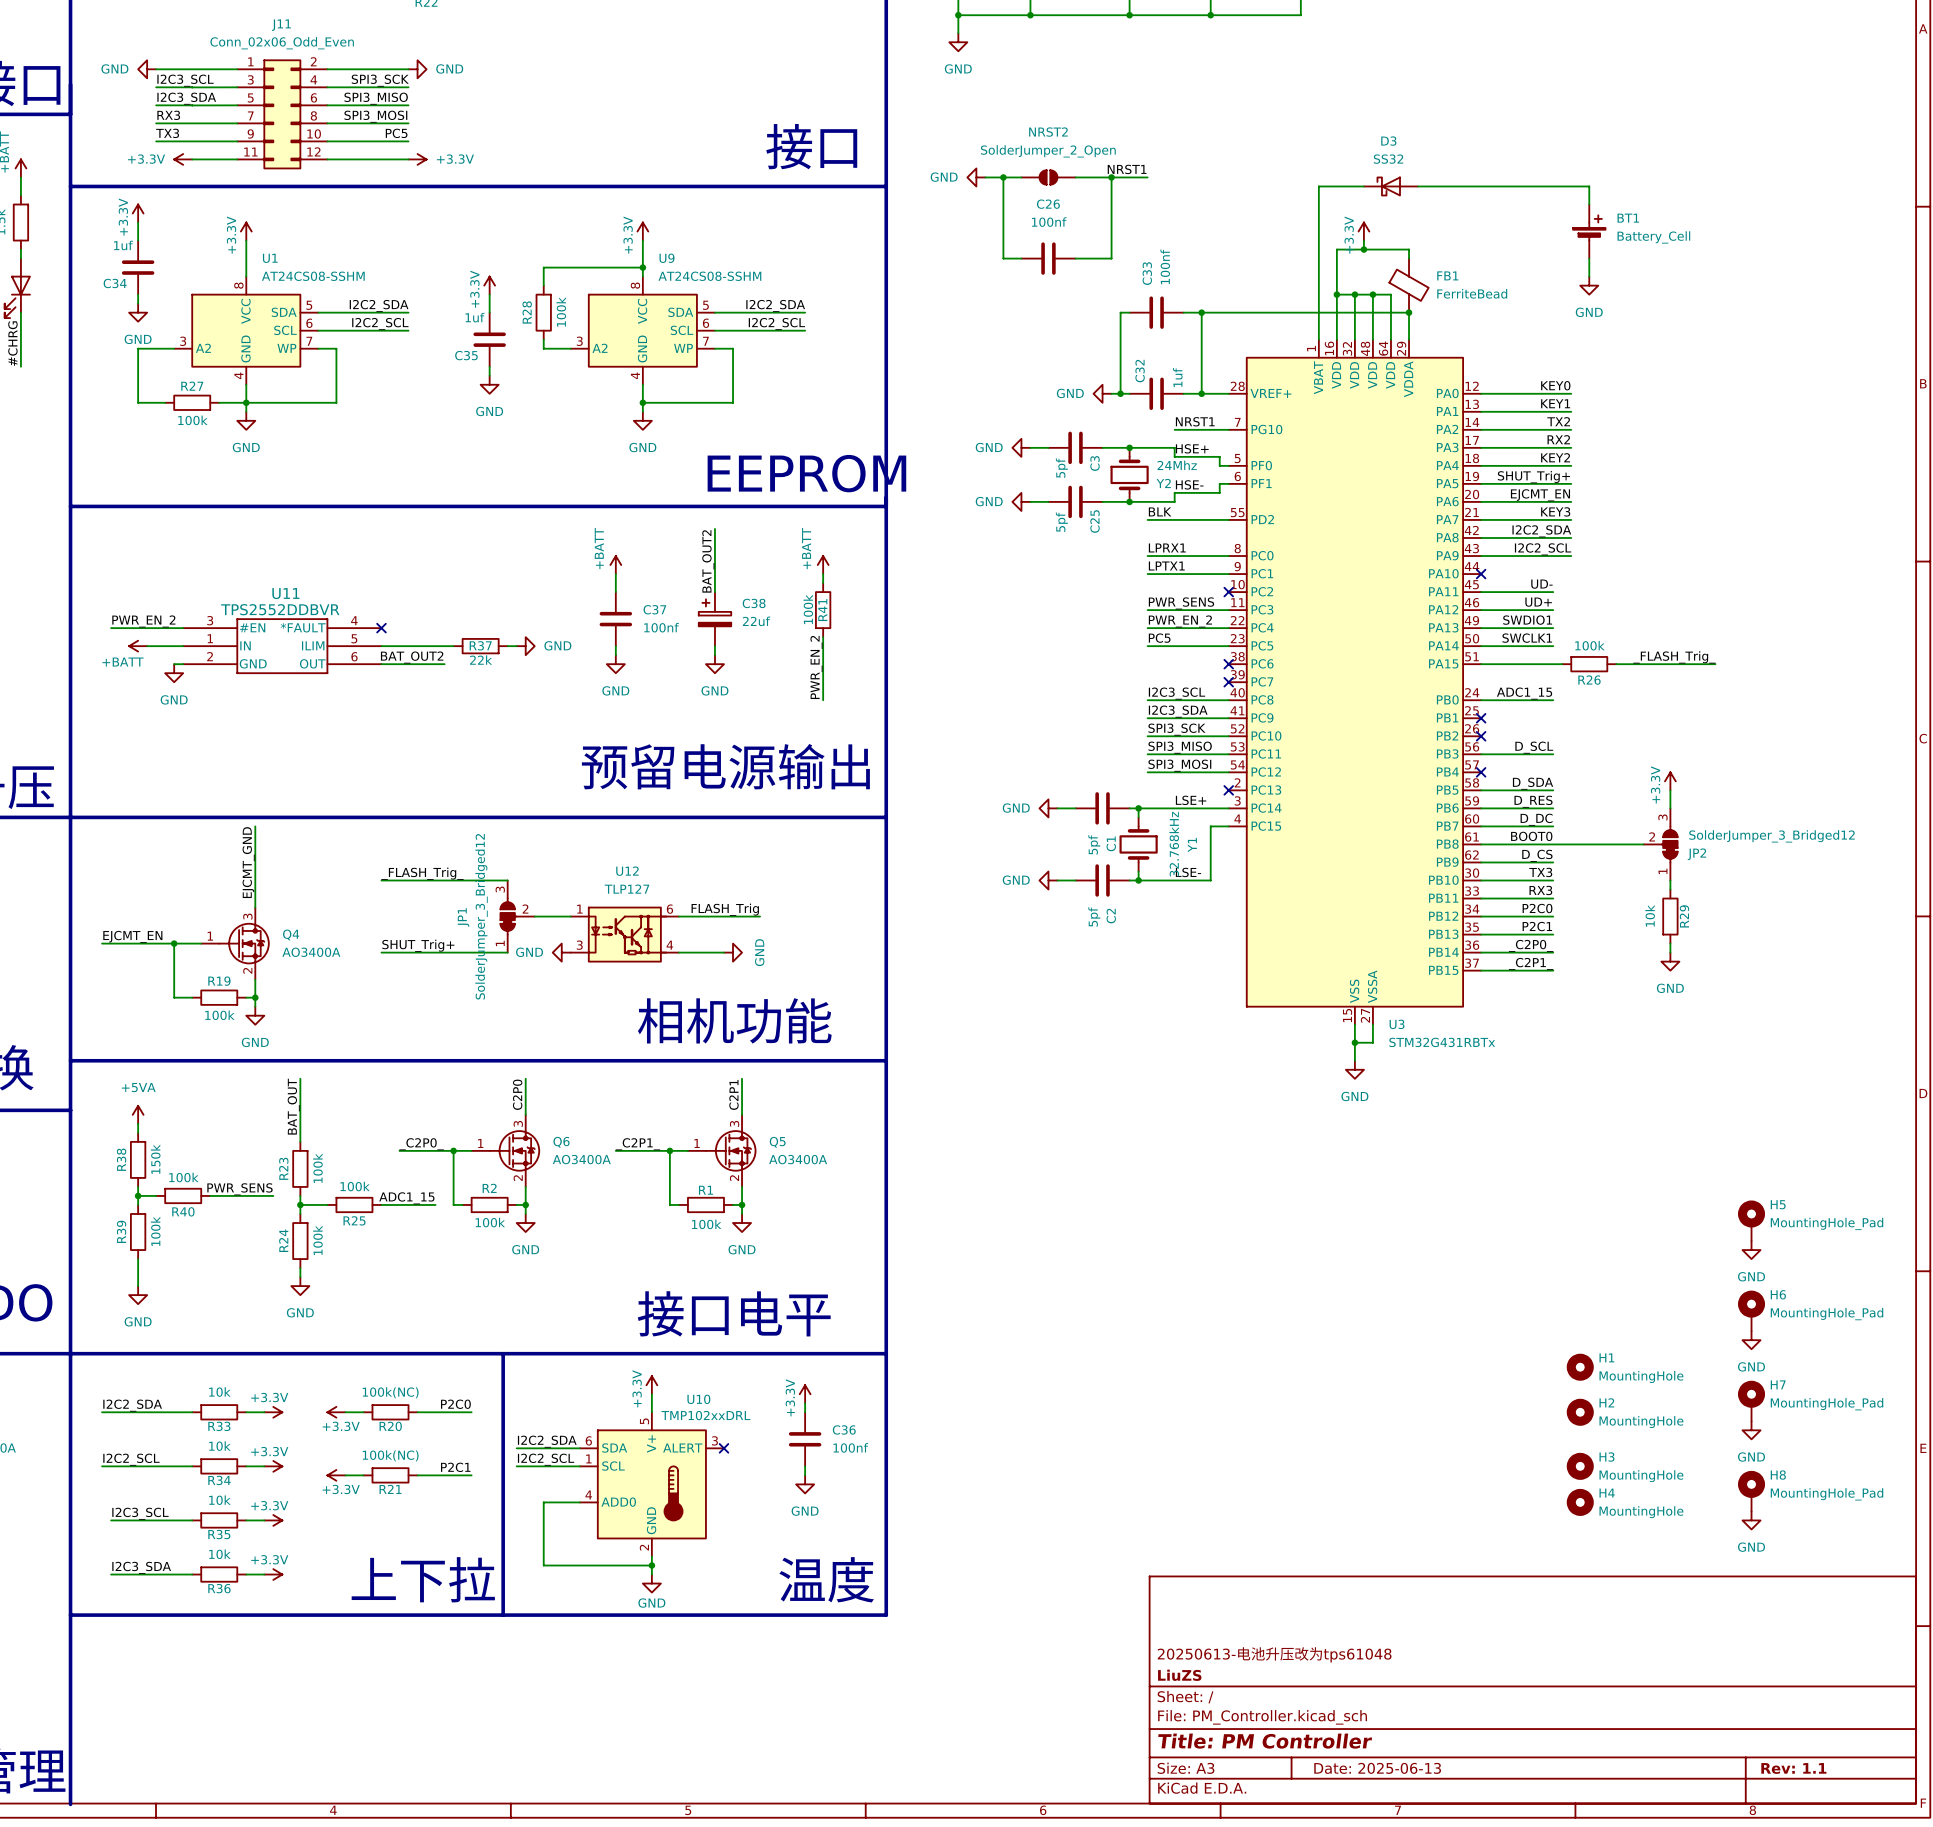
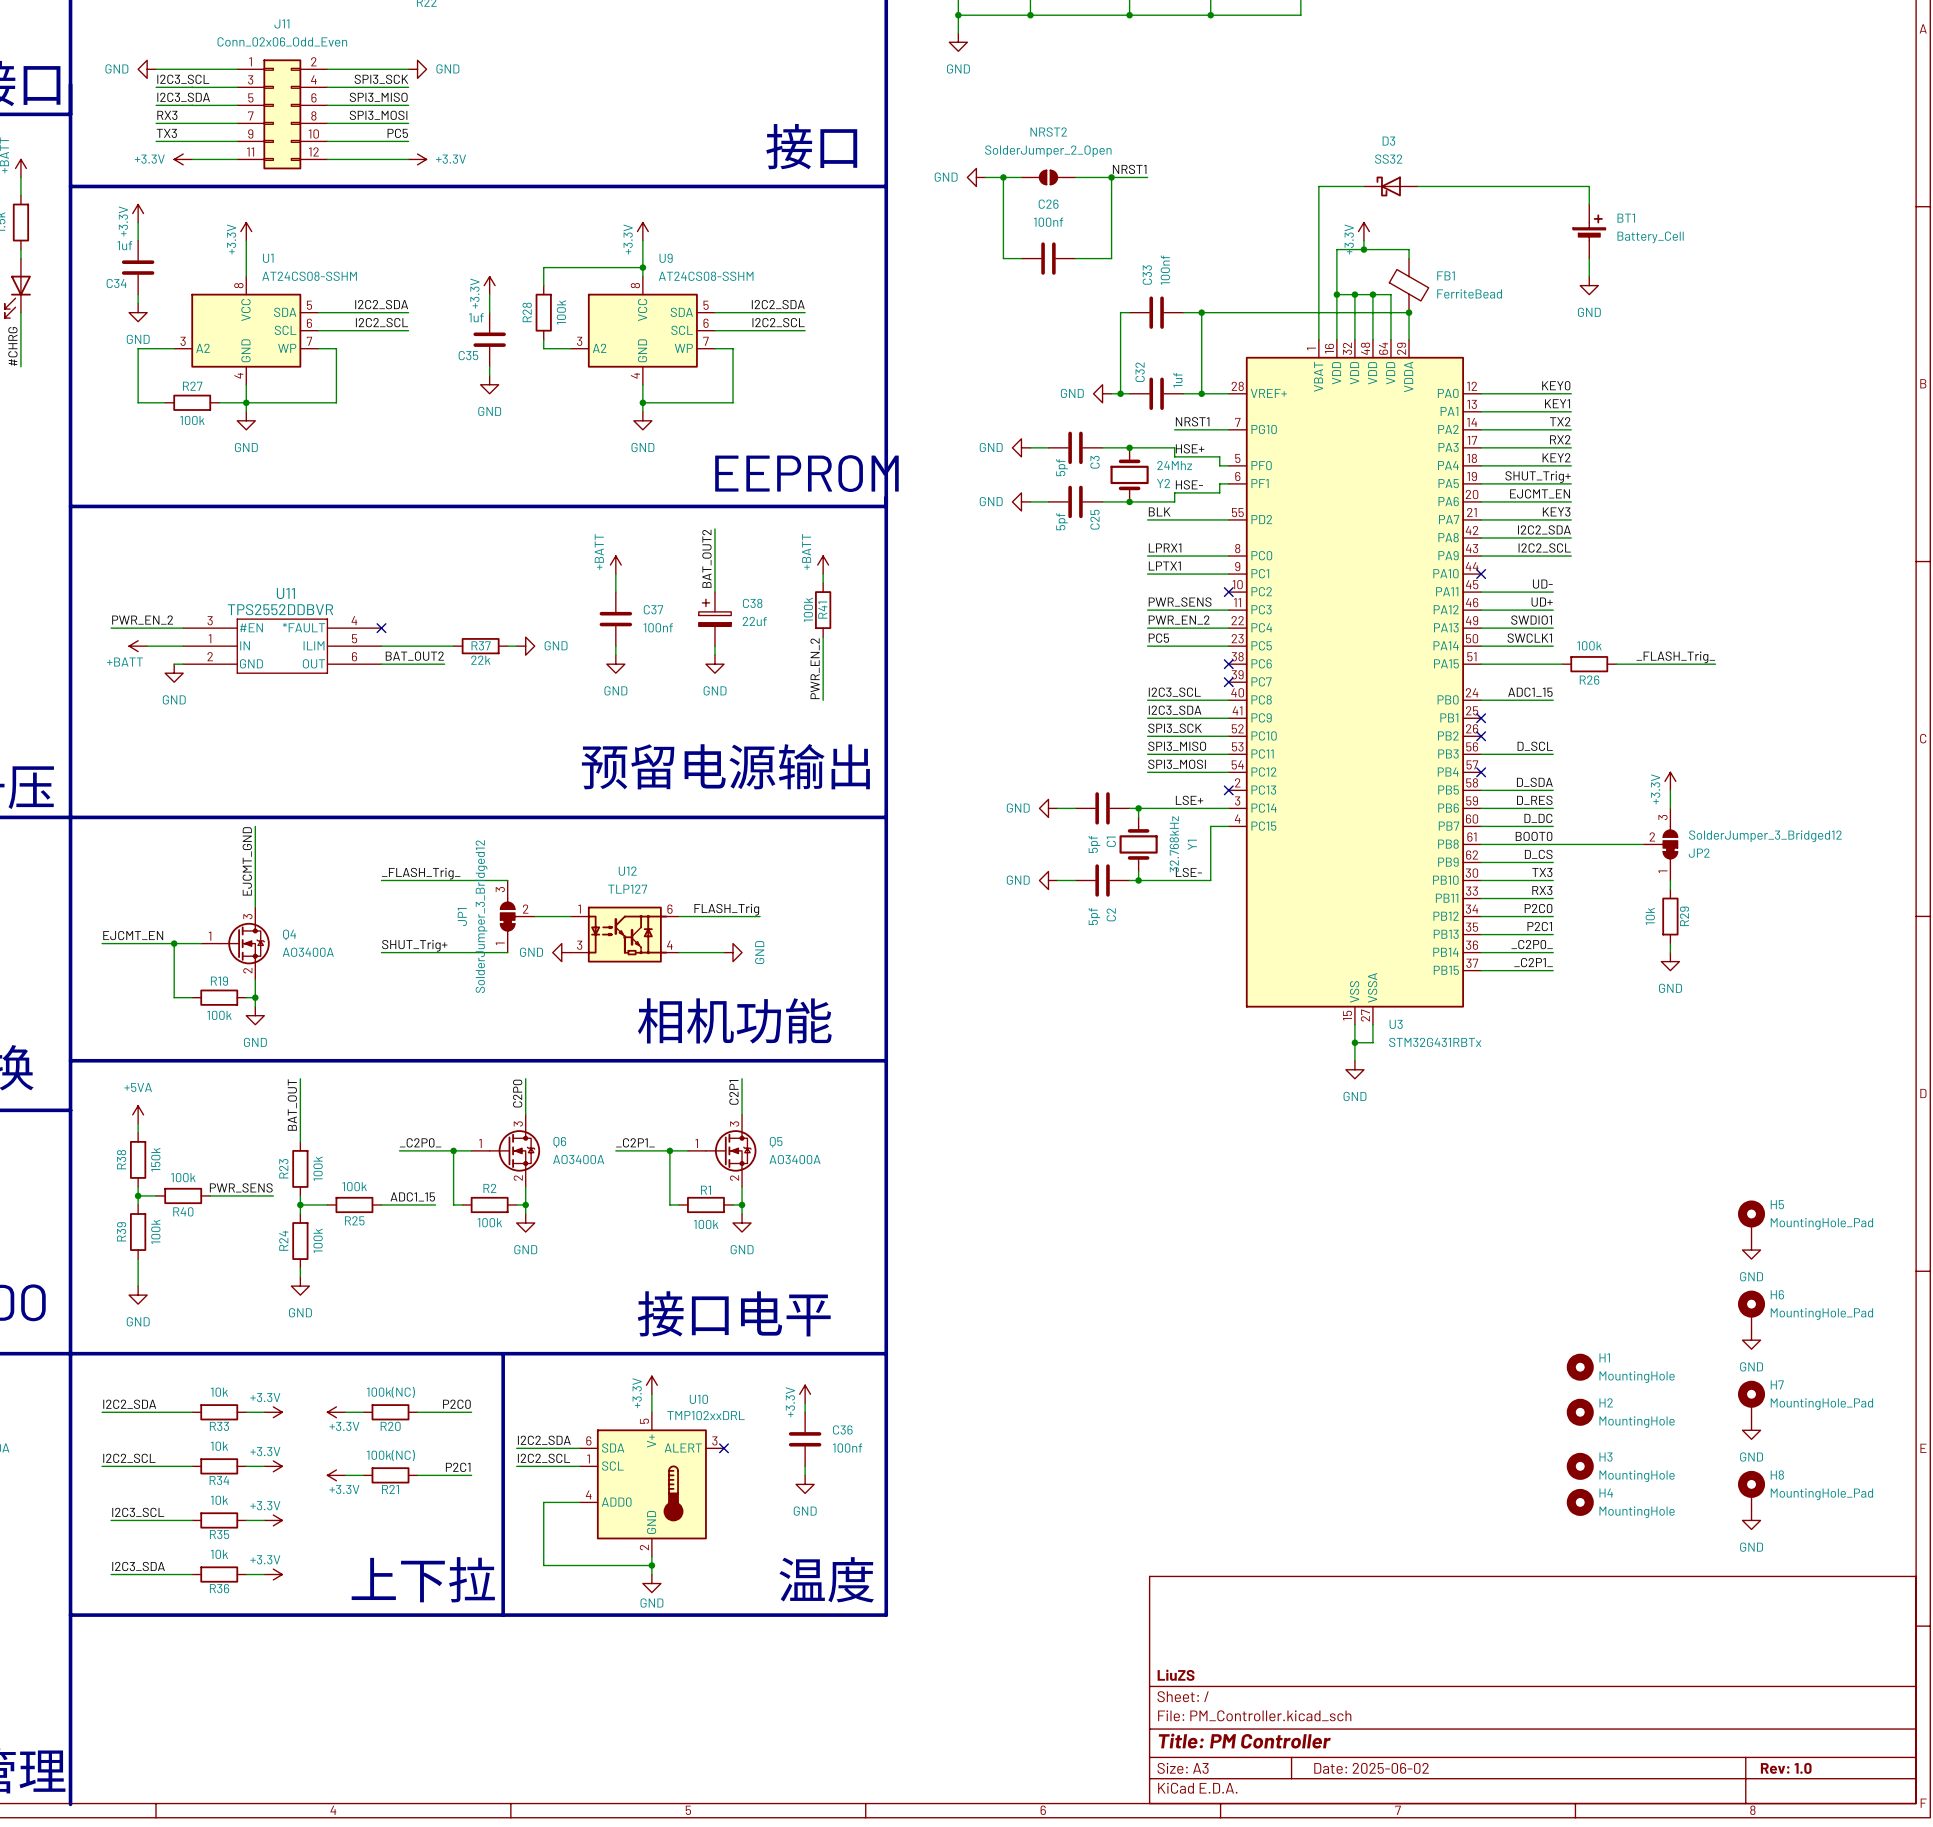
title block: 20250613-电池升压改为tps61048 (1274, 1654) -> none
title block: Date: 2025-06-13 (1377, 1768) -> Date: 2025-06-02 (1371, 1768)
title block: Rev: 1.1 (1793, 1768) -> Rev: 1.0 (1786, 1768)

